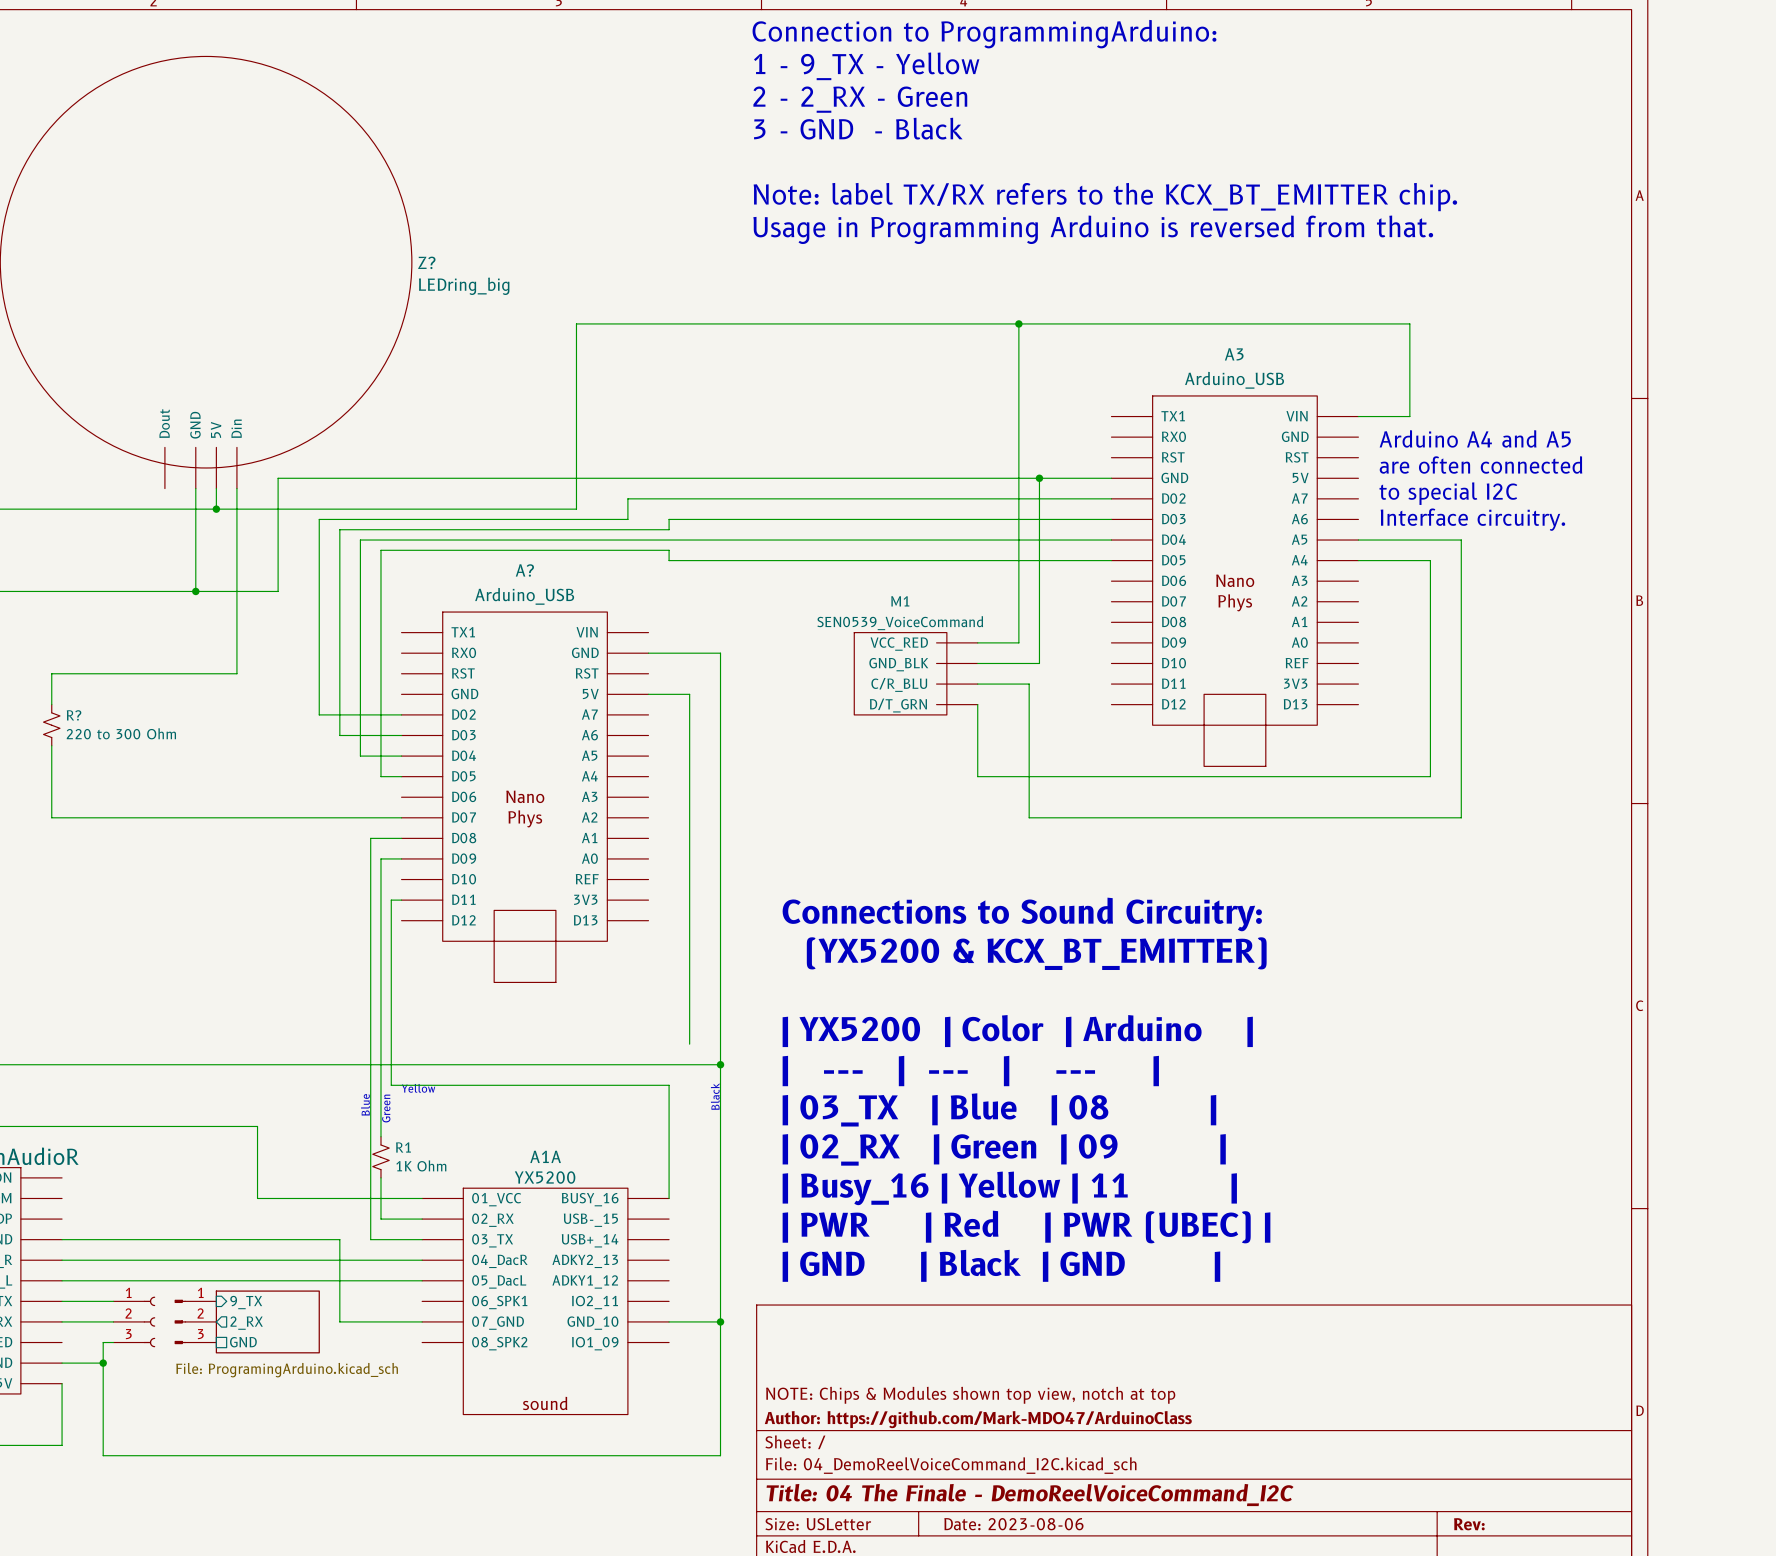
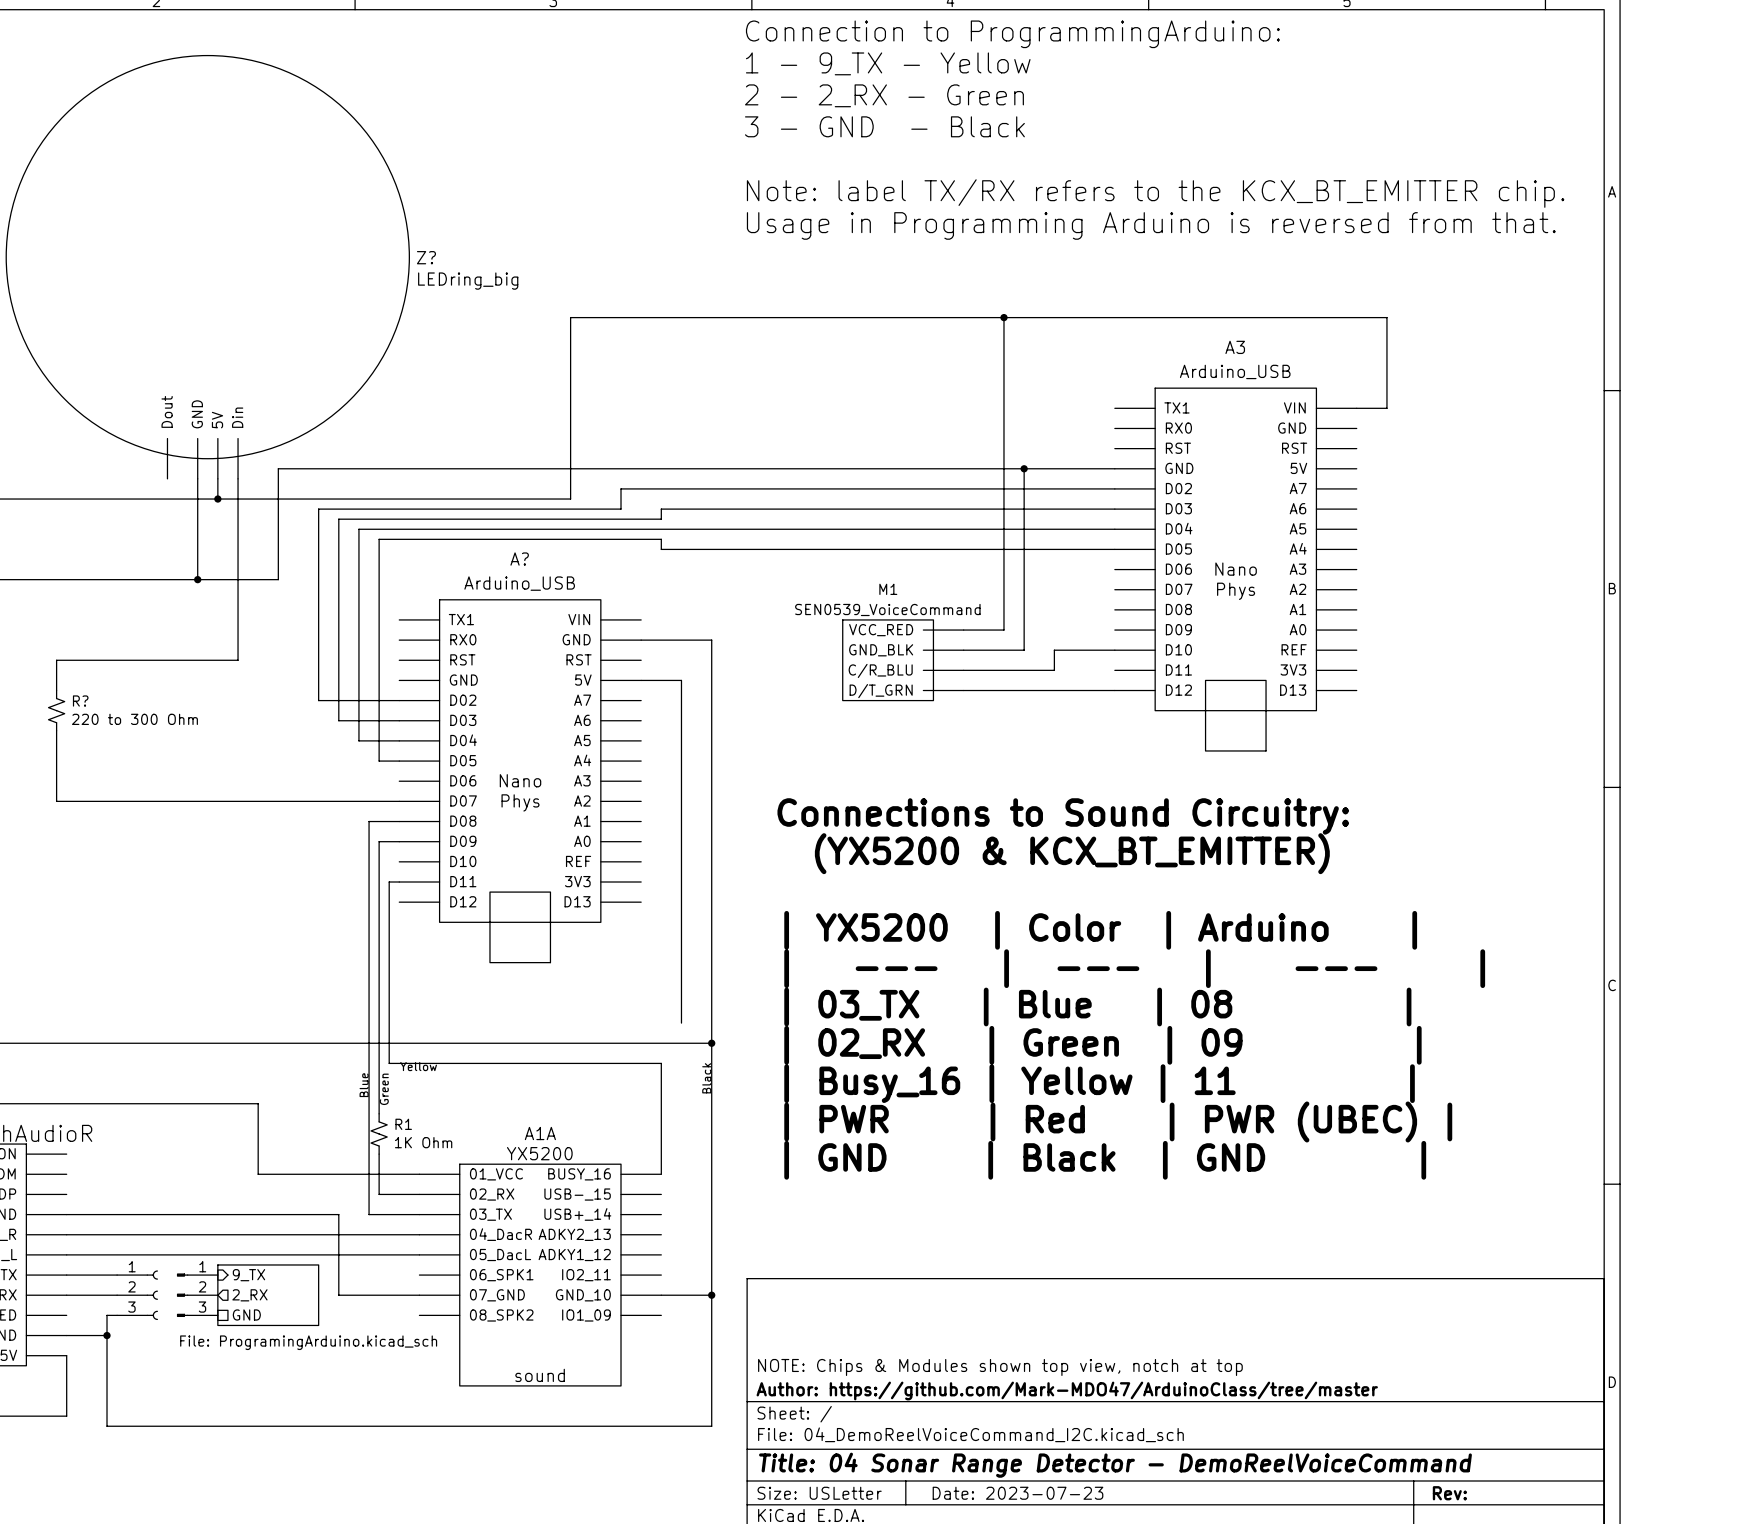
text: Arduino A4 and A5 (1475, 438) -> none
text: are often connected (1481, 465) -> none
text: to special I2C (1448, 493) -> none
text: Interface circuitry. (1472, 519) -> none
wire: (1358, 540) (1461, 540) (1461, 817) (1029, 817) (1029, 684) -> (1114, 650) (1054, 650) (1054, 670) (1014, 670)
wire: (1358, 560) (1430, 560) (1430, 776) (977, 776) (977, 704) -> (1114, 690) (963, 690)
A3 position: (1234, 581) -> (1235, 569)
text position: Connections to Sound Circuitry: (1022, 914) -> Connections to Sound Circuitry: (1063, 816)
text position: (YX5200 & KCX_BT_EMITTER) (1036, 953) -> (YX5200 & KCX_BT_EMITTER) (1072, 853)
text position: | YX5200 | Color | Arduino | (1017, 1031) -> | YX5200 | Color | Arduino | (1100, 930)
text position: | --- | --- | --- | (970, 1071) -> | --- | --- | --- | (1134, 968)
text position: | 03_TX | Blue | 08 | (999, 1109) -> | 03_TX | Blue | 08 | (1097, 1006)
text position: | 02_RX | Green | 09 | (1004, 1149) -> | 02_RX | Green | 09 | (1102, 1045)
text position: | Busy_16 | Yellow | 11 | (1009, 1188) -> | Busy_16 | Yellow | 11 | (1099, 1083)
text position: | PWR | Red | PWR (UBEC) | (1026, 1227) -> | PWR | Red | PWR (UBEC) | (1118, 1121)
text position: | GND | Black | GND | (1001, 1265) -> | GND | Black | GND | (1105, 1160)
title block: Author: https://github.com/Mark-MDO47/ArduinoClass (978, 1419) -> Author: https://github.com/Mark-MDO47/ArduinoClass/tree/master (1067, 1390)
title block: Title: 04 The Finale - DemoReelVoiceCommand_I2C (1030, 1495) -> Title: 04 Sonar Range Detector - DemoReelVoiceCommand (1115, 1465)
title block: Date: 2023-08-06 (1013, 1524) -> Date: 2023-07-23 (1018, 1493)

